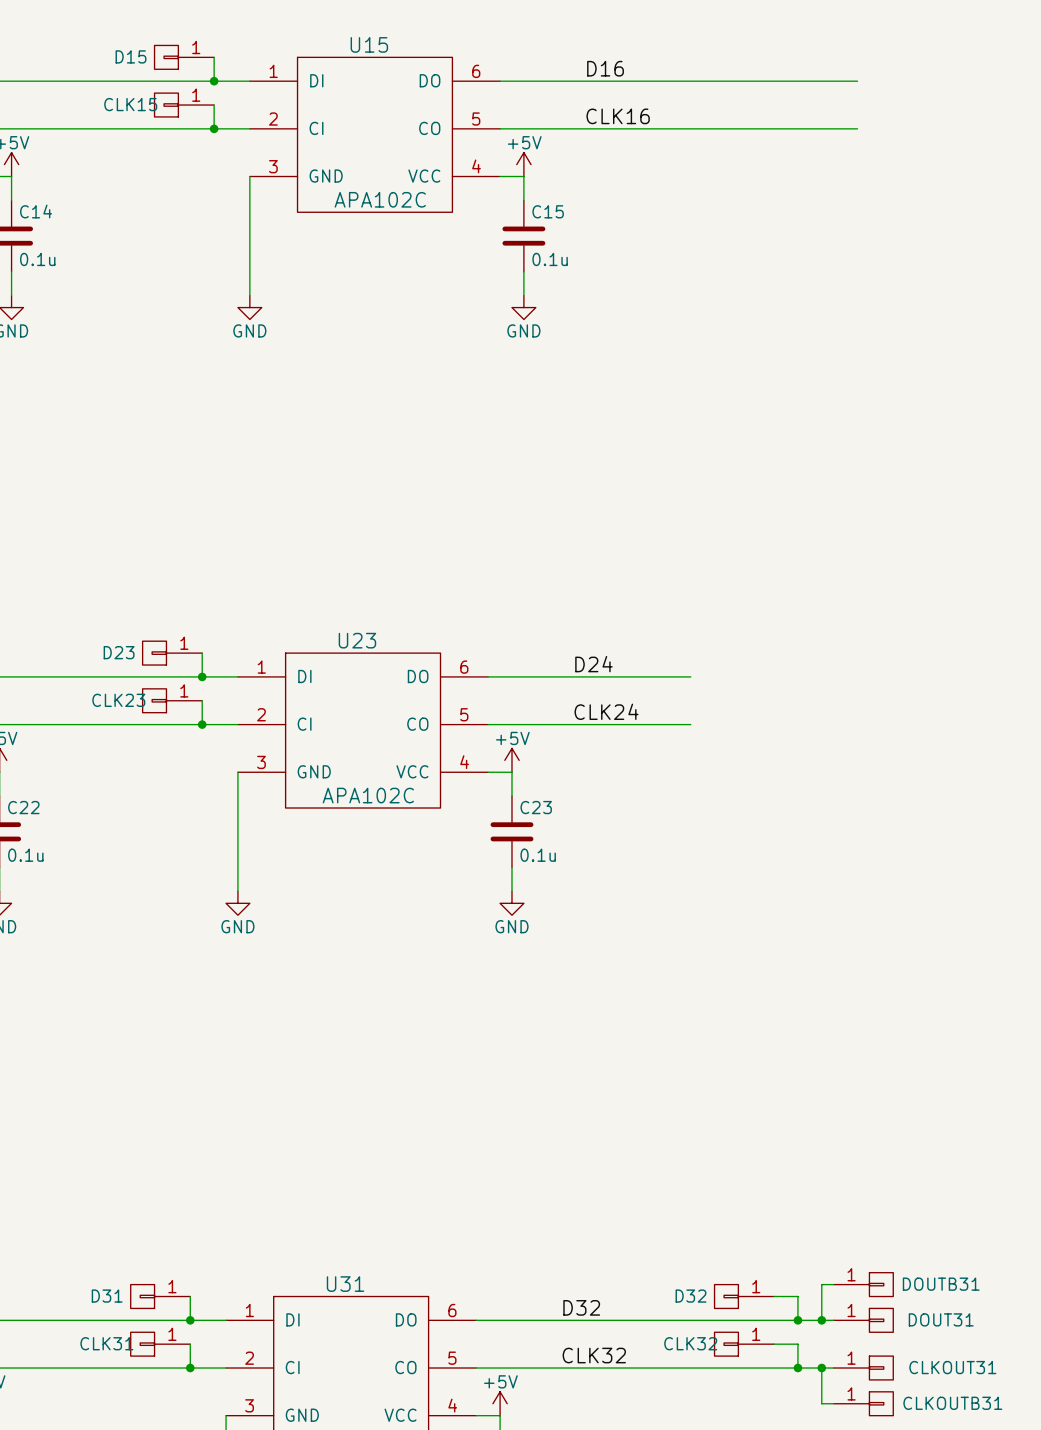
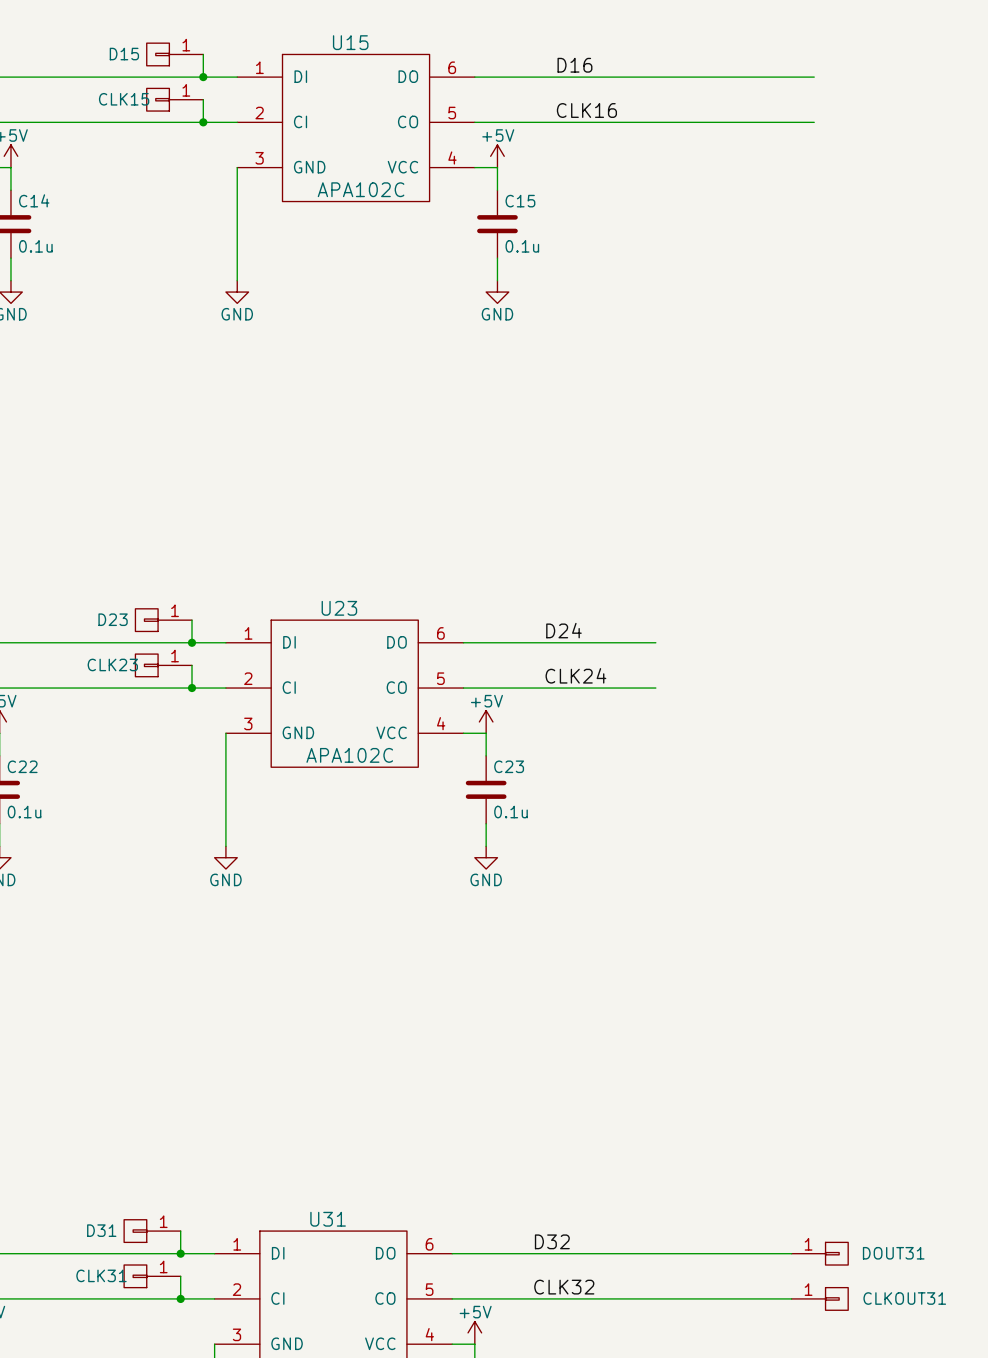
wire: (833, 1284) (821, 1284) (821, 1320) -> none
DOUTB31: (863, 1284) -> none
D32: (744, 1296) -> none
wire: (774, 1296) (797, 1296) (797, 1320) -> none
junction: (797, 1320) -> none
junction: (821, 1320) -> none
CLK32: (744, 1344) -> none
wire: (774, 1344) (797, 1344) (797, 1368) -> none
junction: (797, 1368) -> none
wire: (821, 1368) (821, 1403) (833, 1403) -> none
junction: (821, 1368) -> none
CLKOUTB31: (863, 1403) -> none

